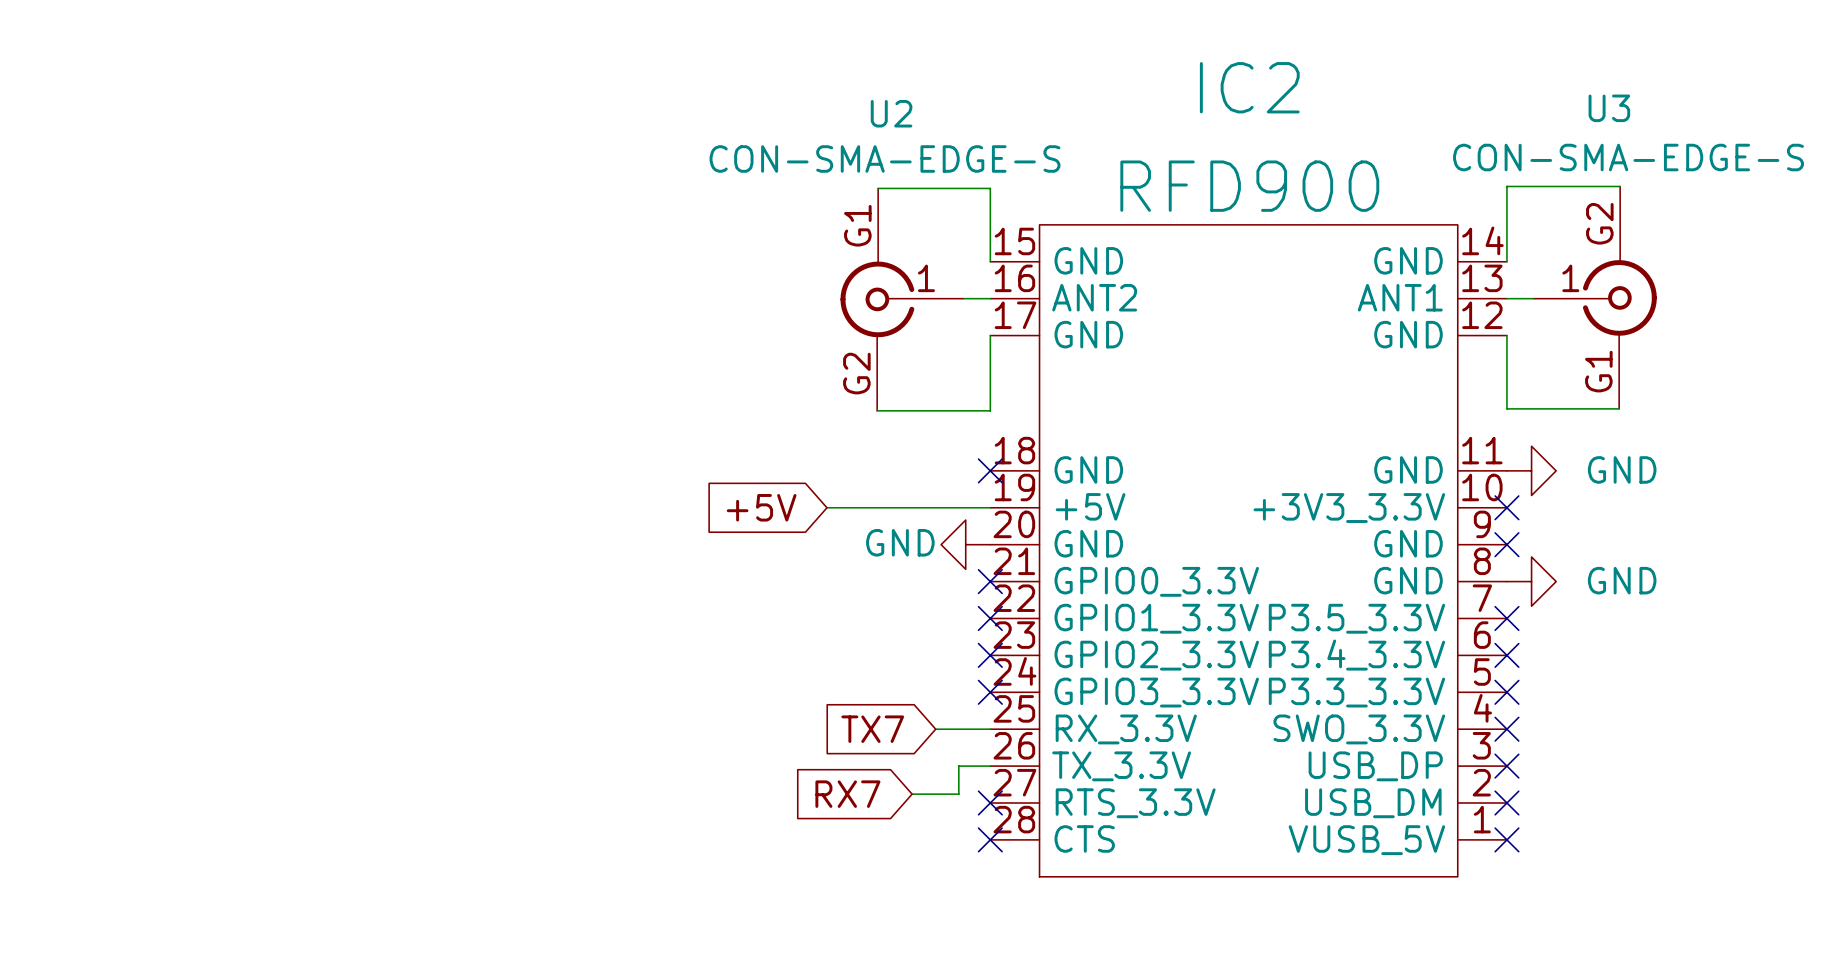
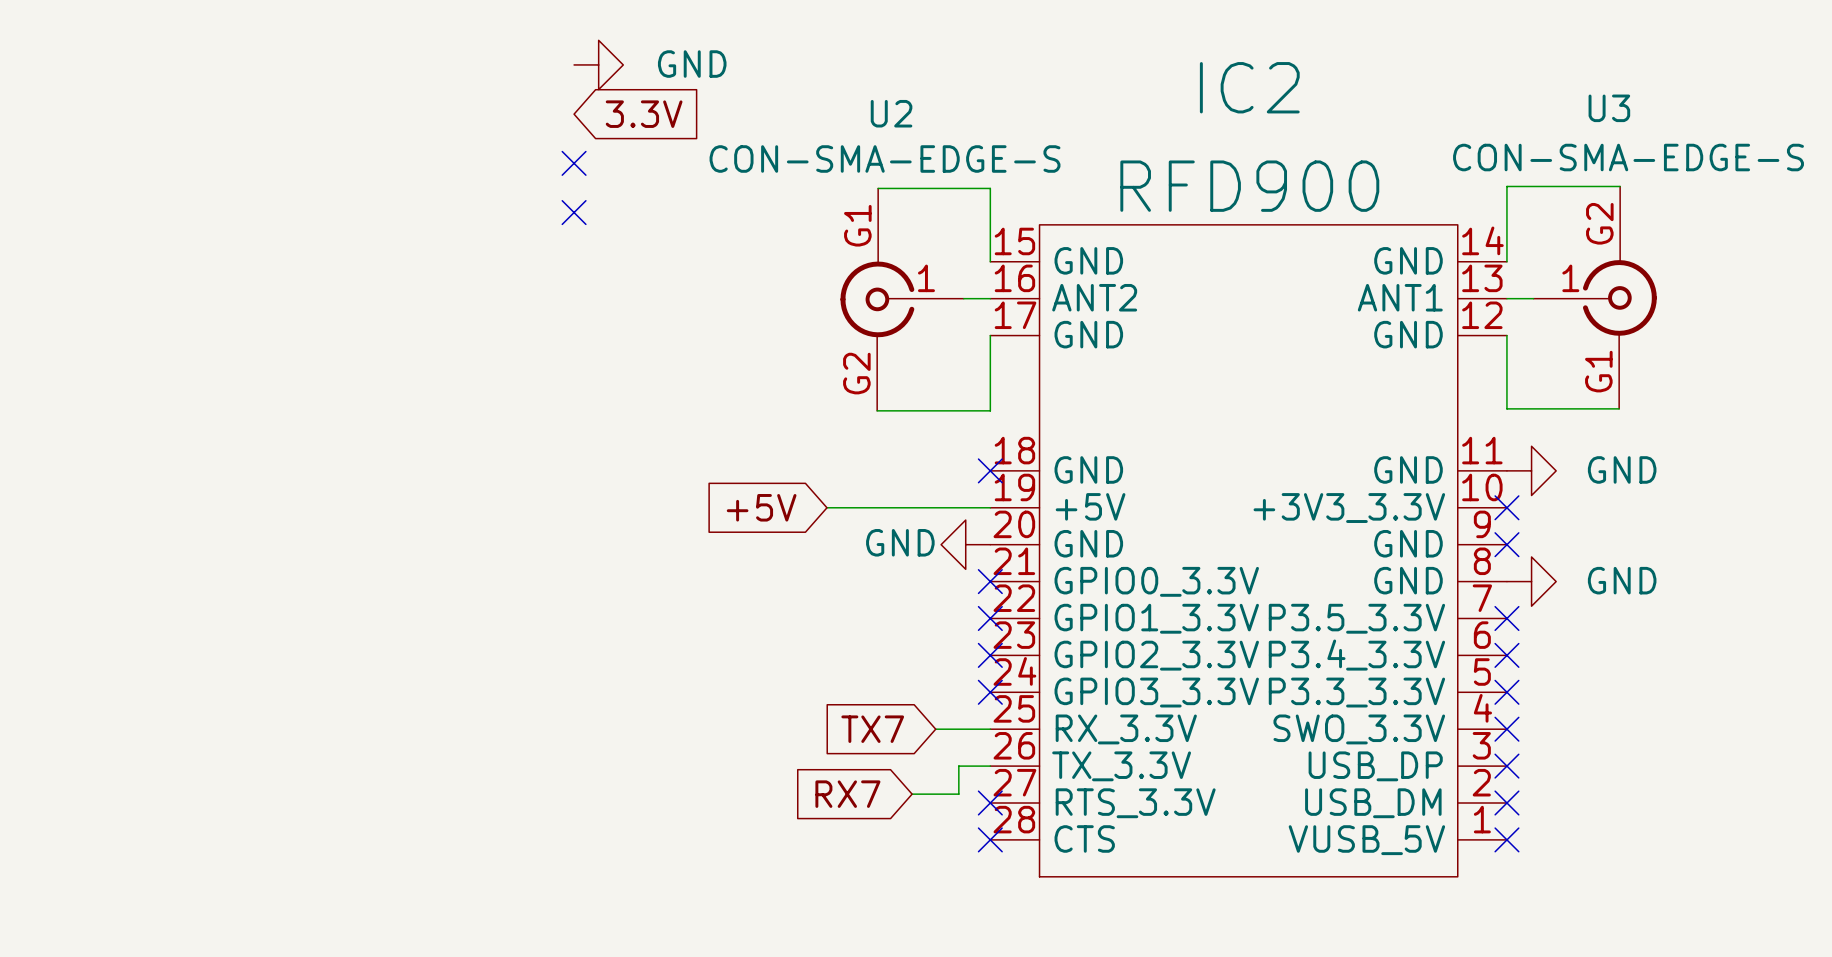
power symbol: none -> GND (598, 64)
global label: none -> 3.3V (644, 114)
no-connect mark: none -> (574, 163)
no-connect mark: none -> (574, 212)

